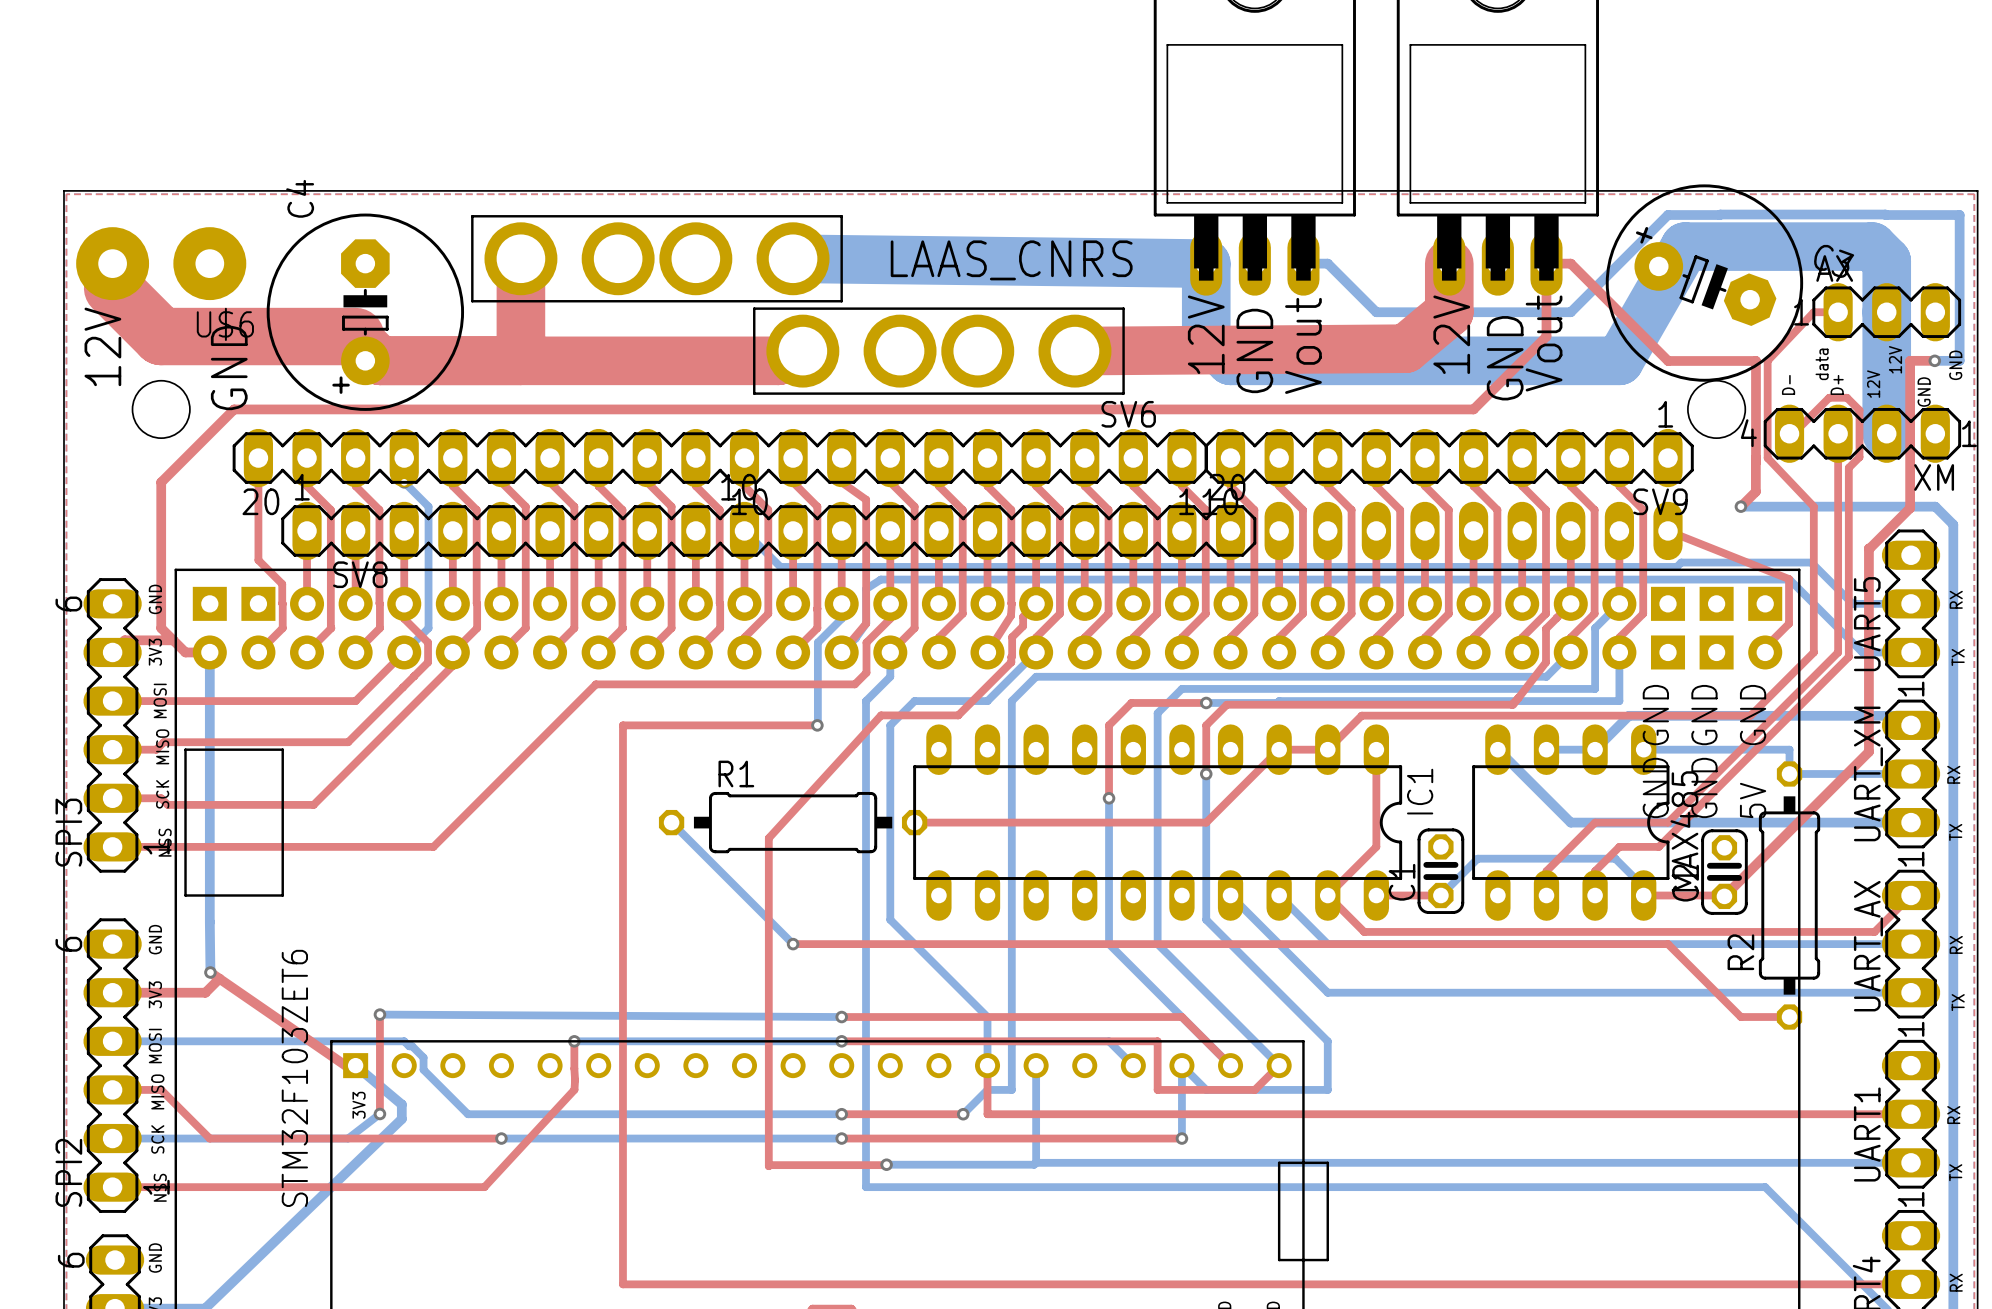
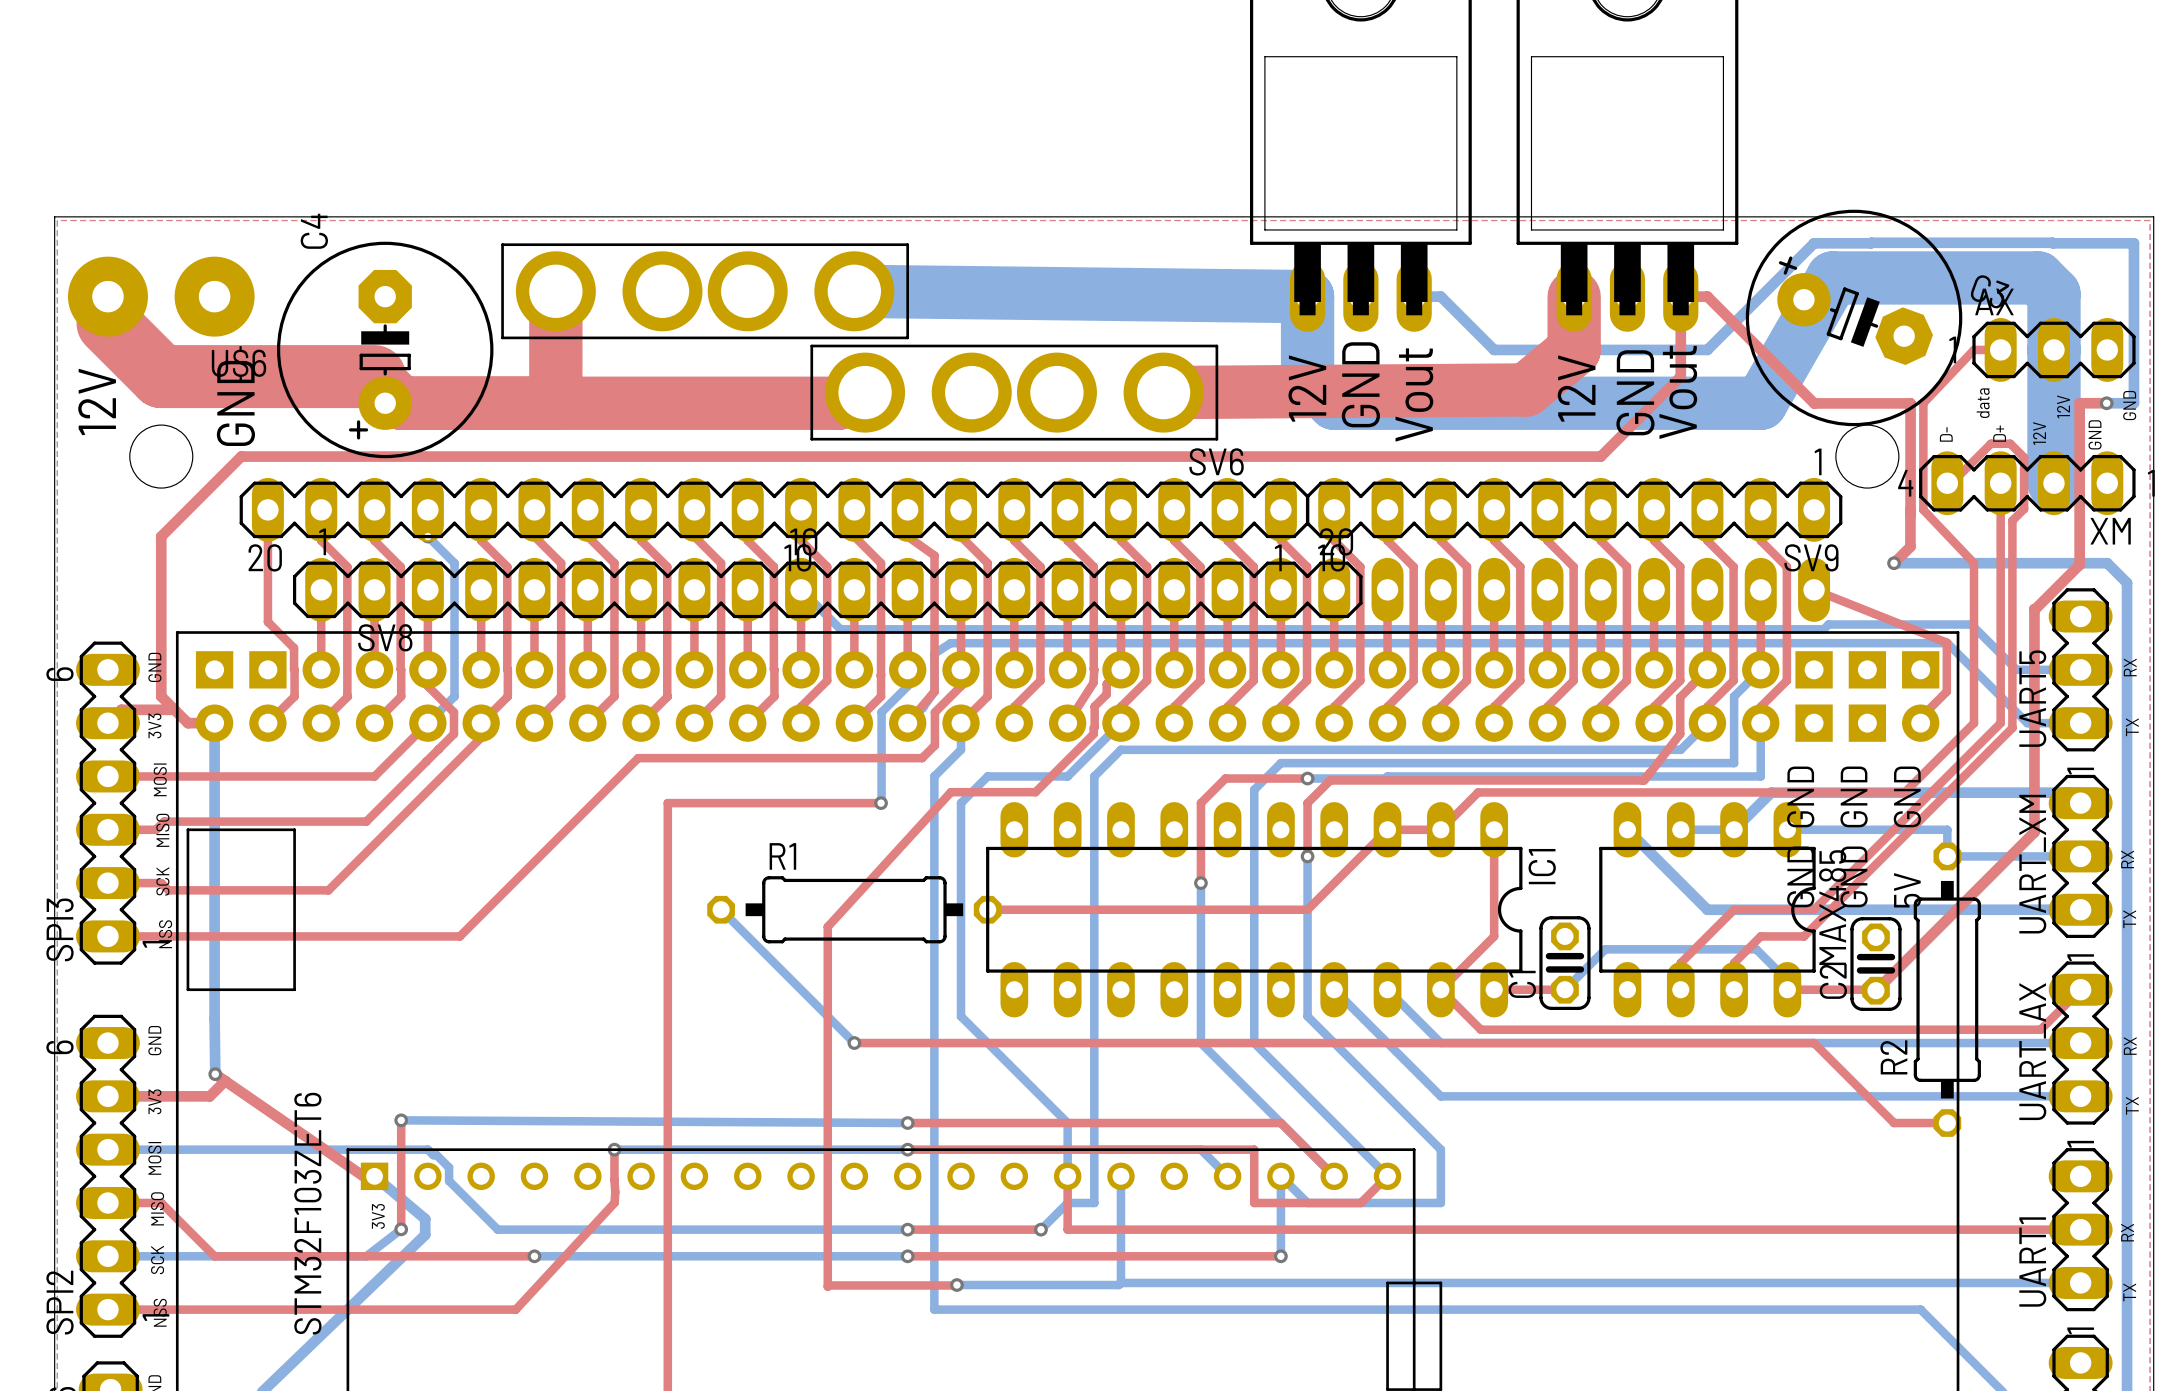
text: LAAS_CNRS (1011, 260) -> none

